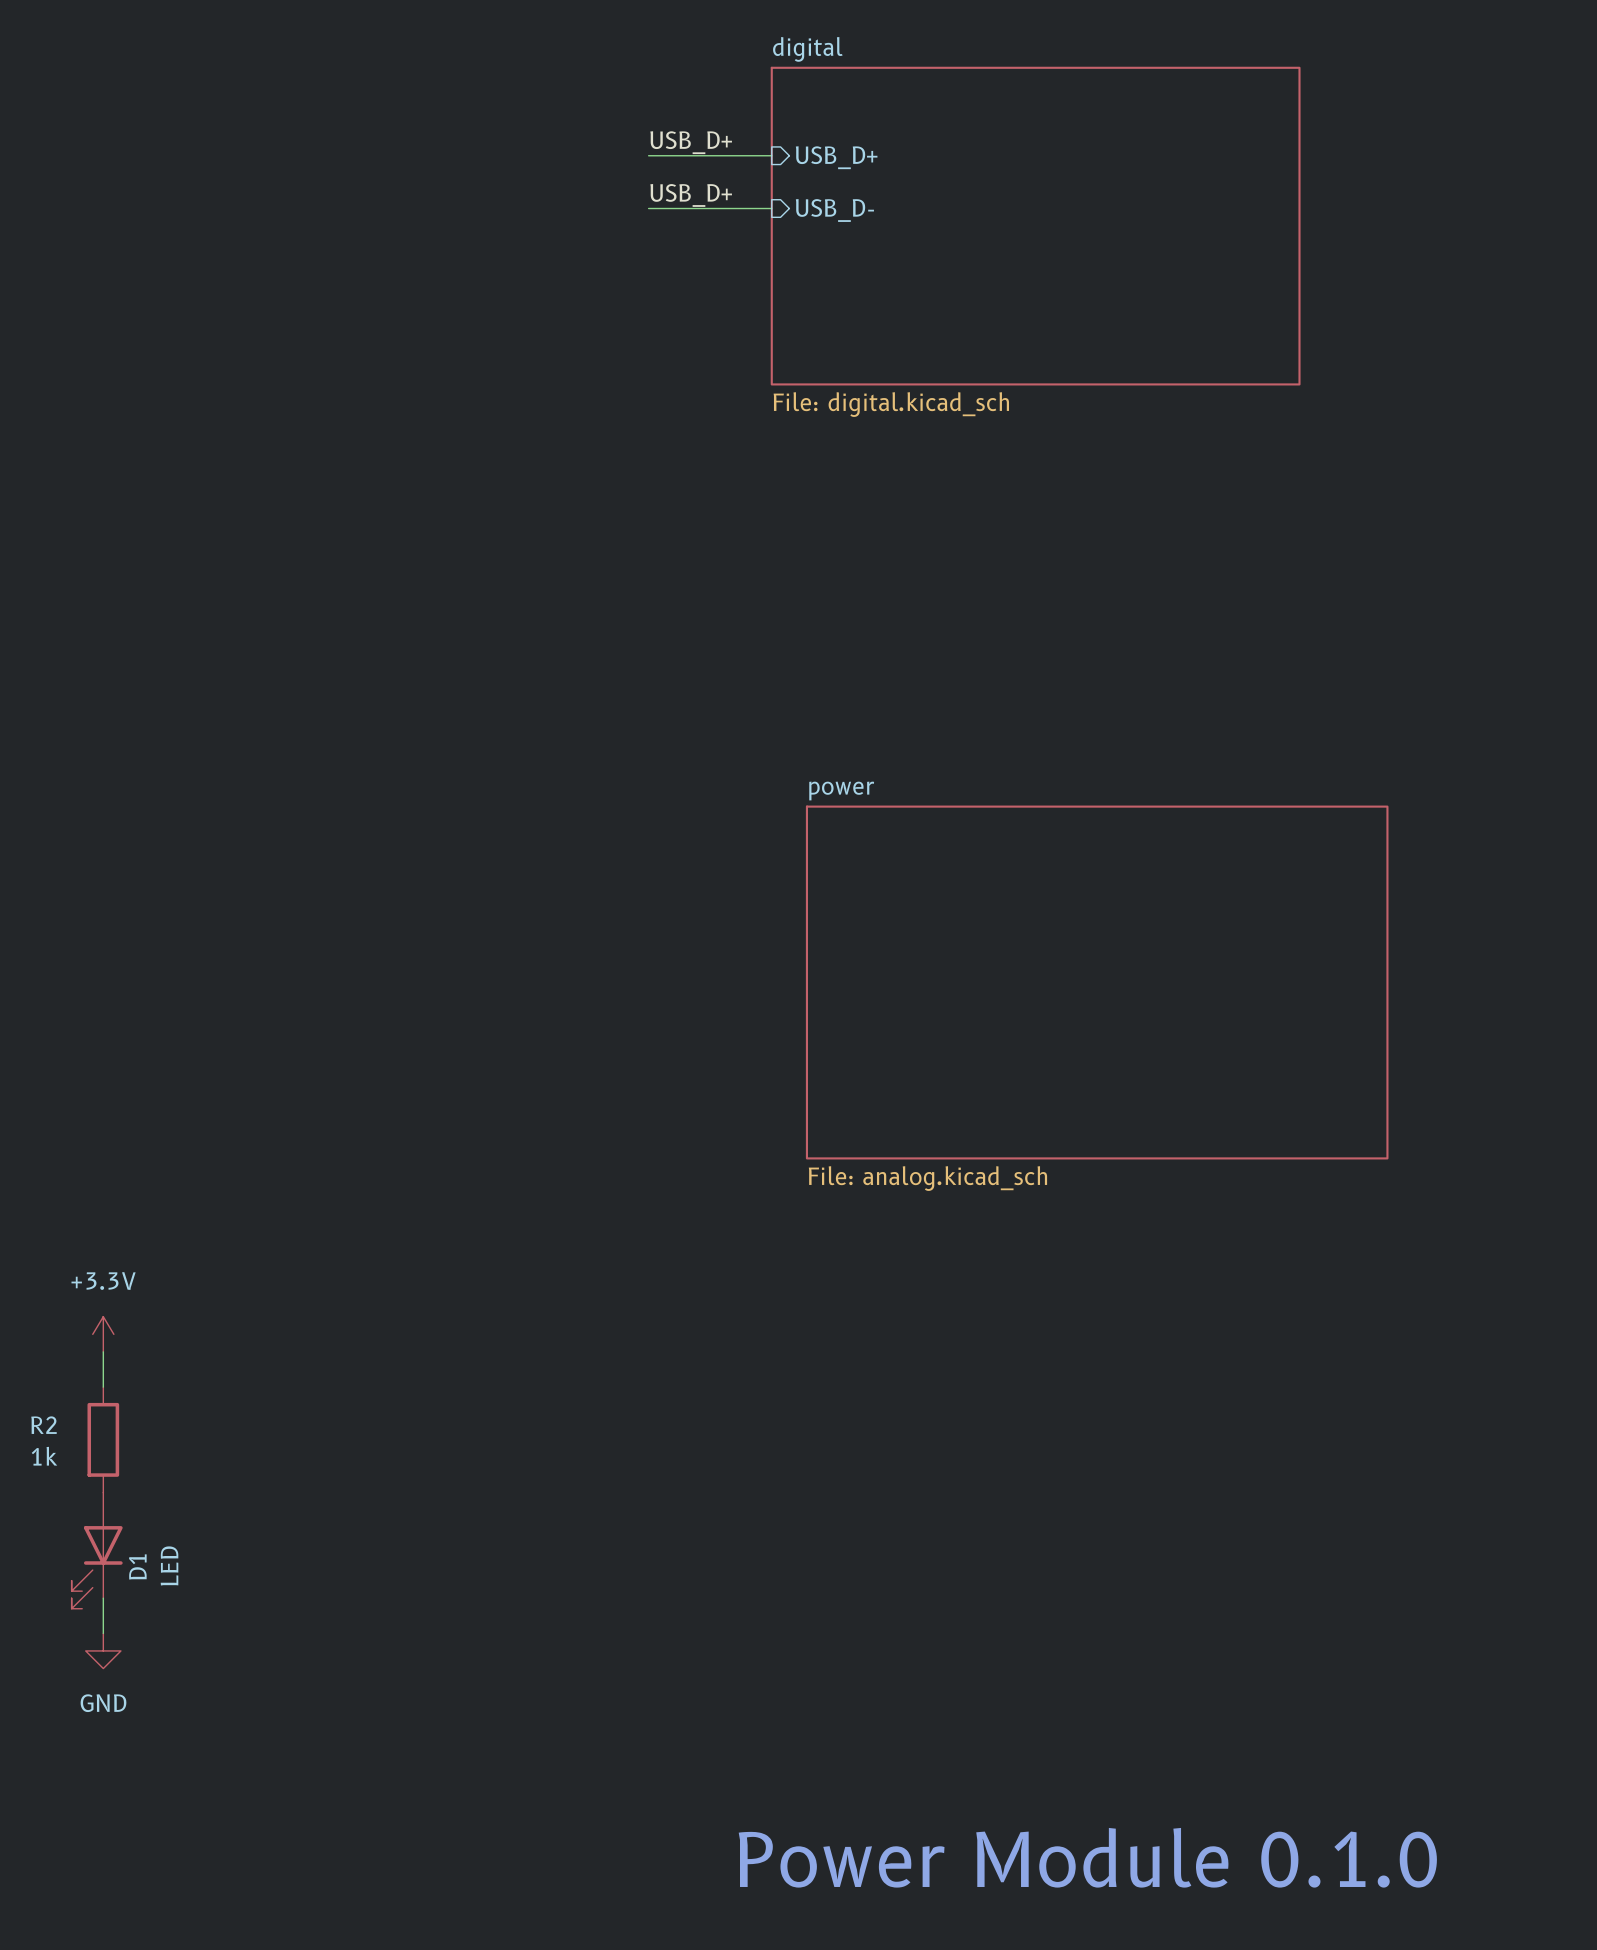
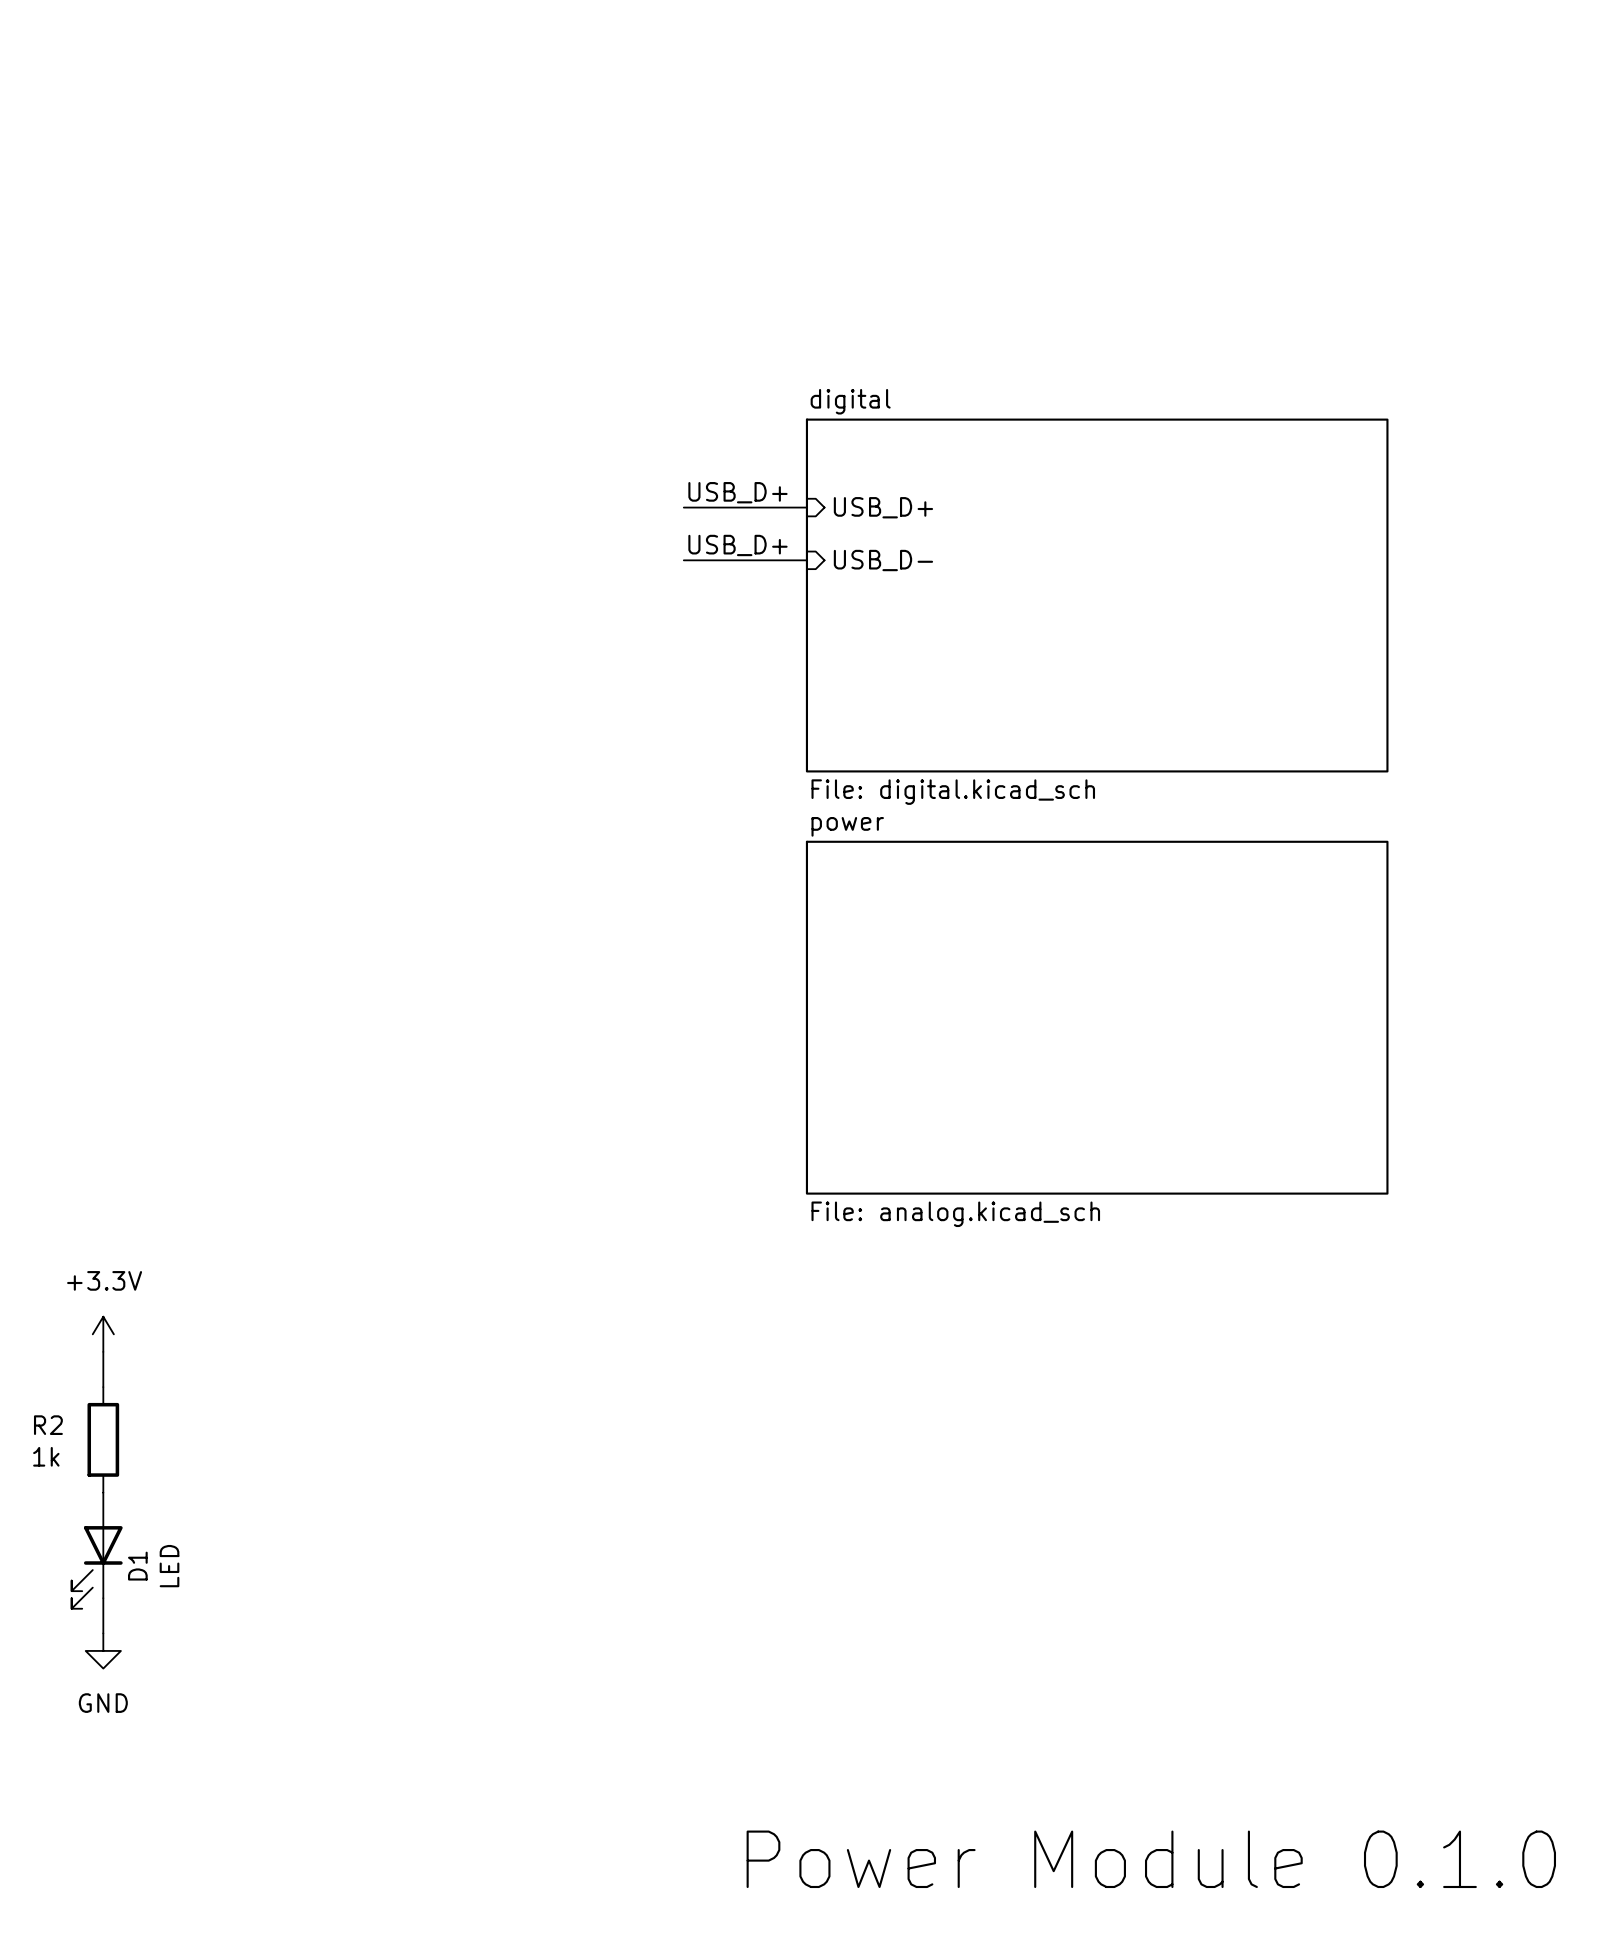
label: USB_D+ (691, 142) -> none
wire: (648, 155) (771, 155) -> none
sheet pin: USB_D+ (836, 157) -> none
label: USB_D+ (691, 195) -> none
wire: (648, 208) (771, 208) -> (683, 507) (806, 507)
sheet pin: USB_D- (834, 210) -> none
sheet digital: File: digital.kicad_sch (1035, 226) -> none
label: none -> USB_D+ (737, 492)
sheet pin: none -> USB_D+ (883, 507)
label: none -> USB_D+ (737, 545)
wire: none -> (683, 560) (806, 560)
sheet pin: none -> USB_D- (883, 560)
sheet digital: none -> File: digital.kicad_sch (1097, 595)
sheet power position: (1097, 982) -> (1097, 1017)

